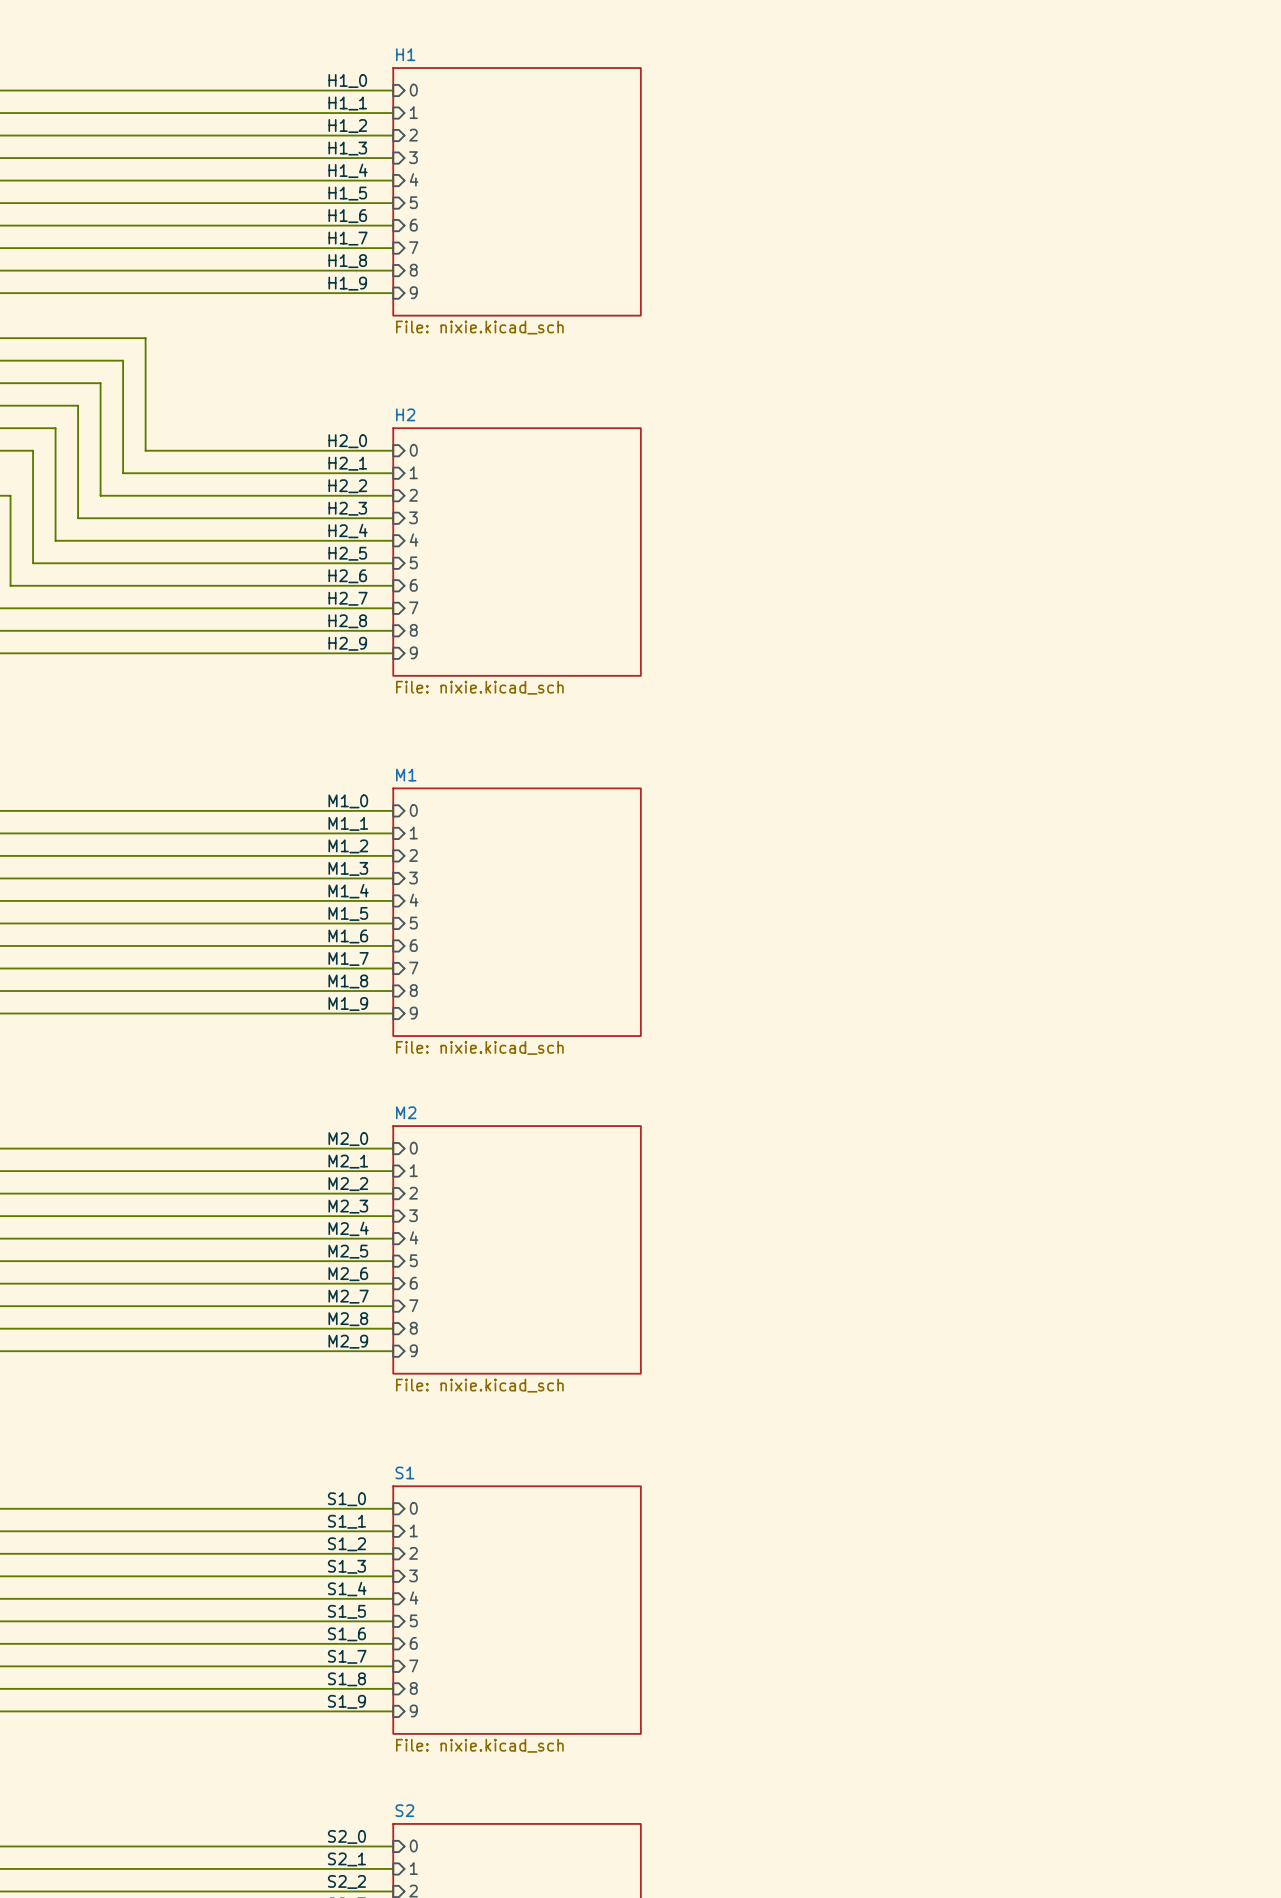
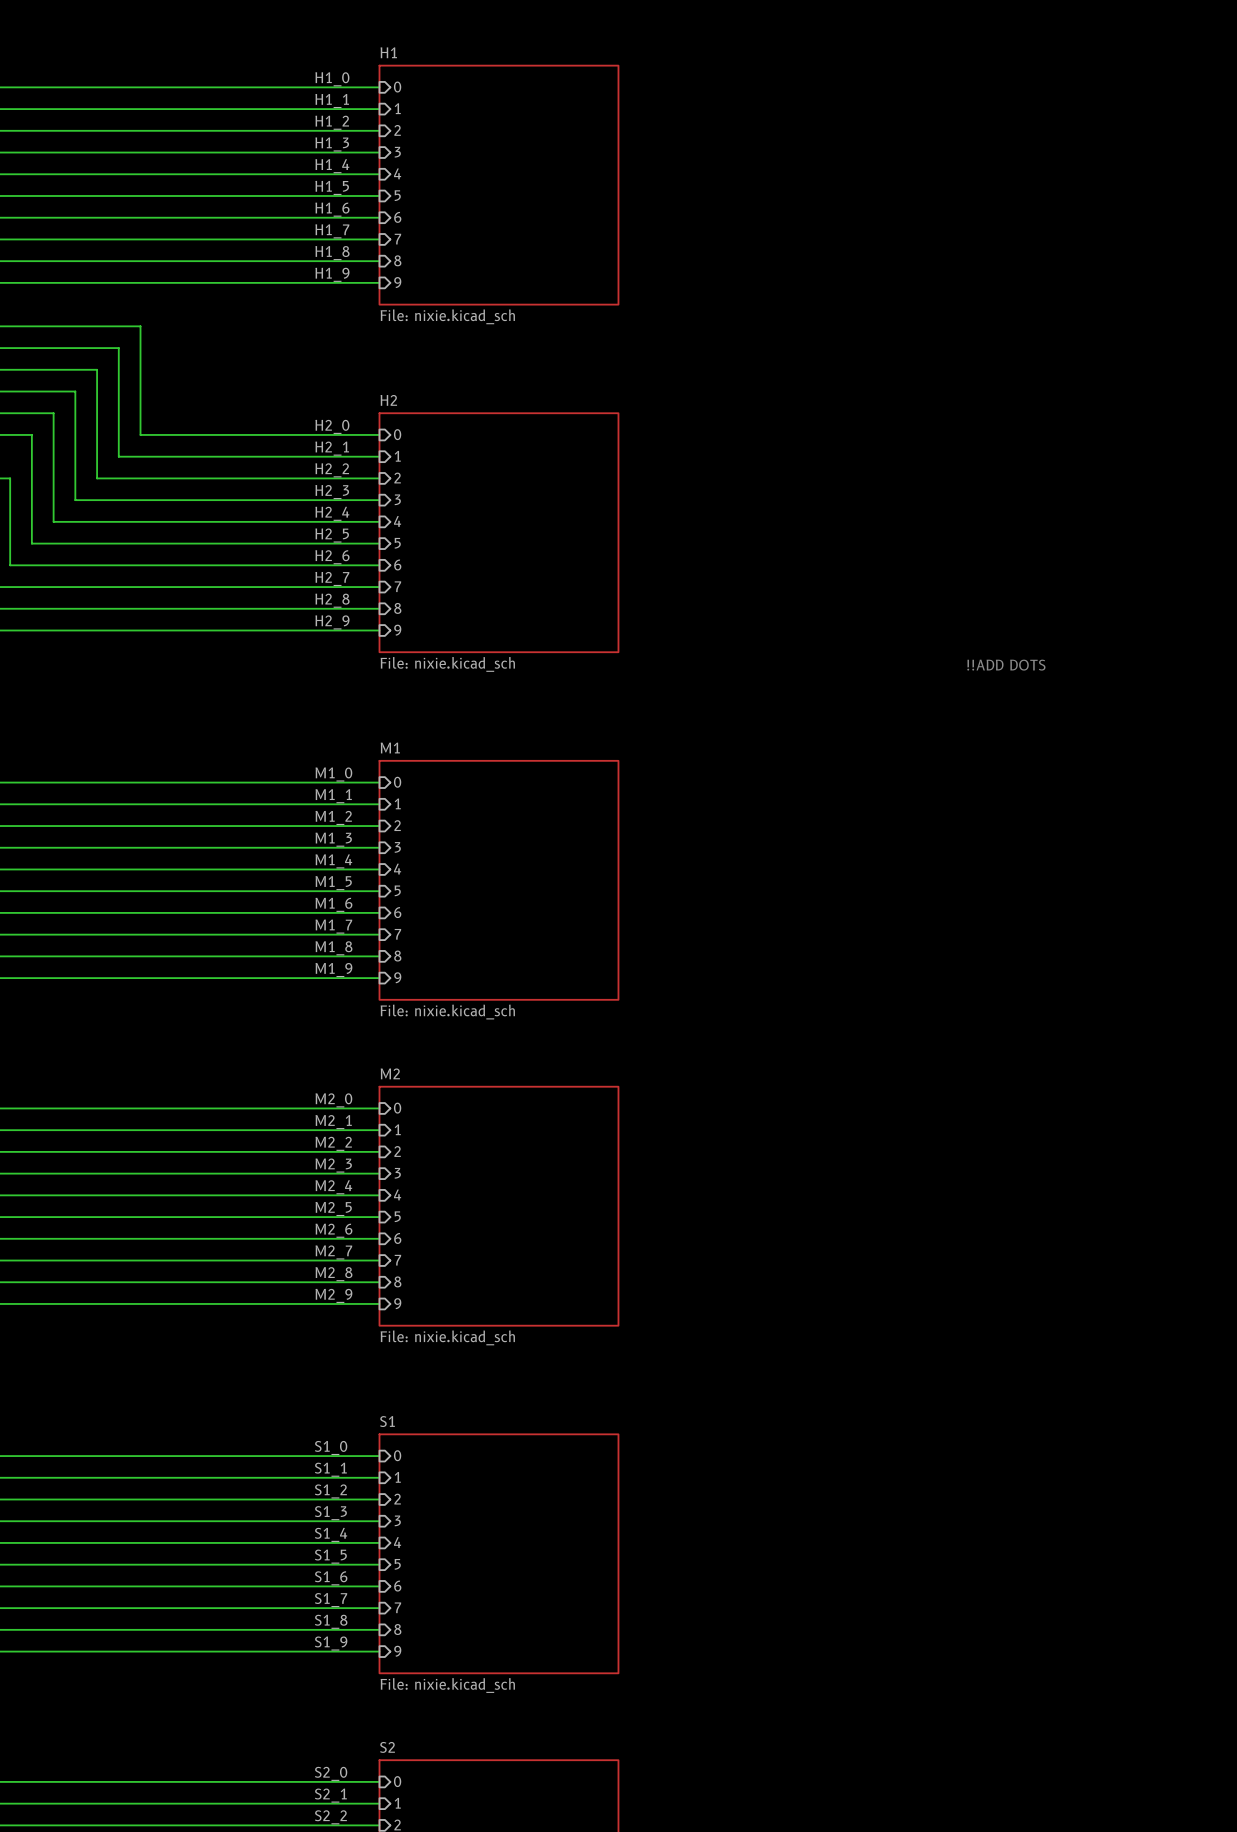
text: none -> !!ADD DOTS (1006, 665)

